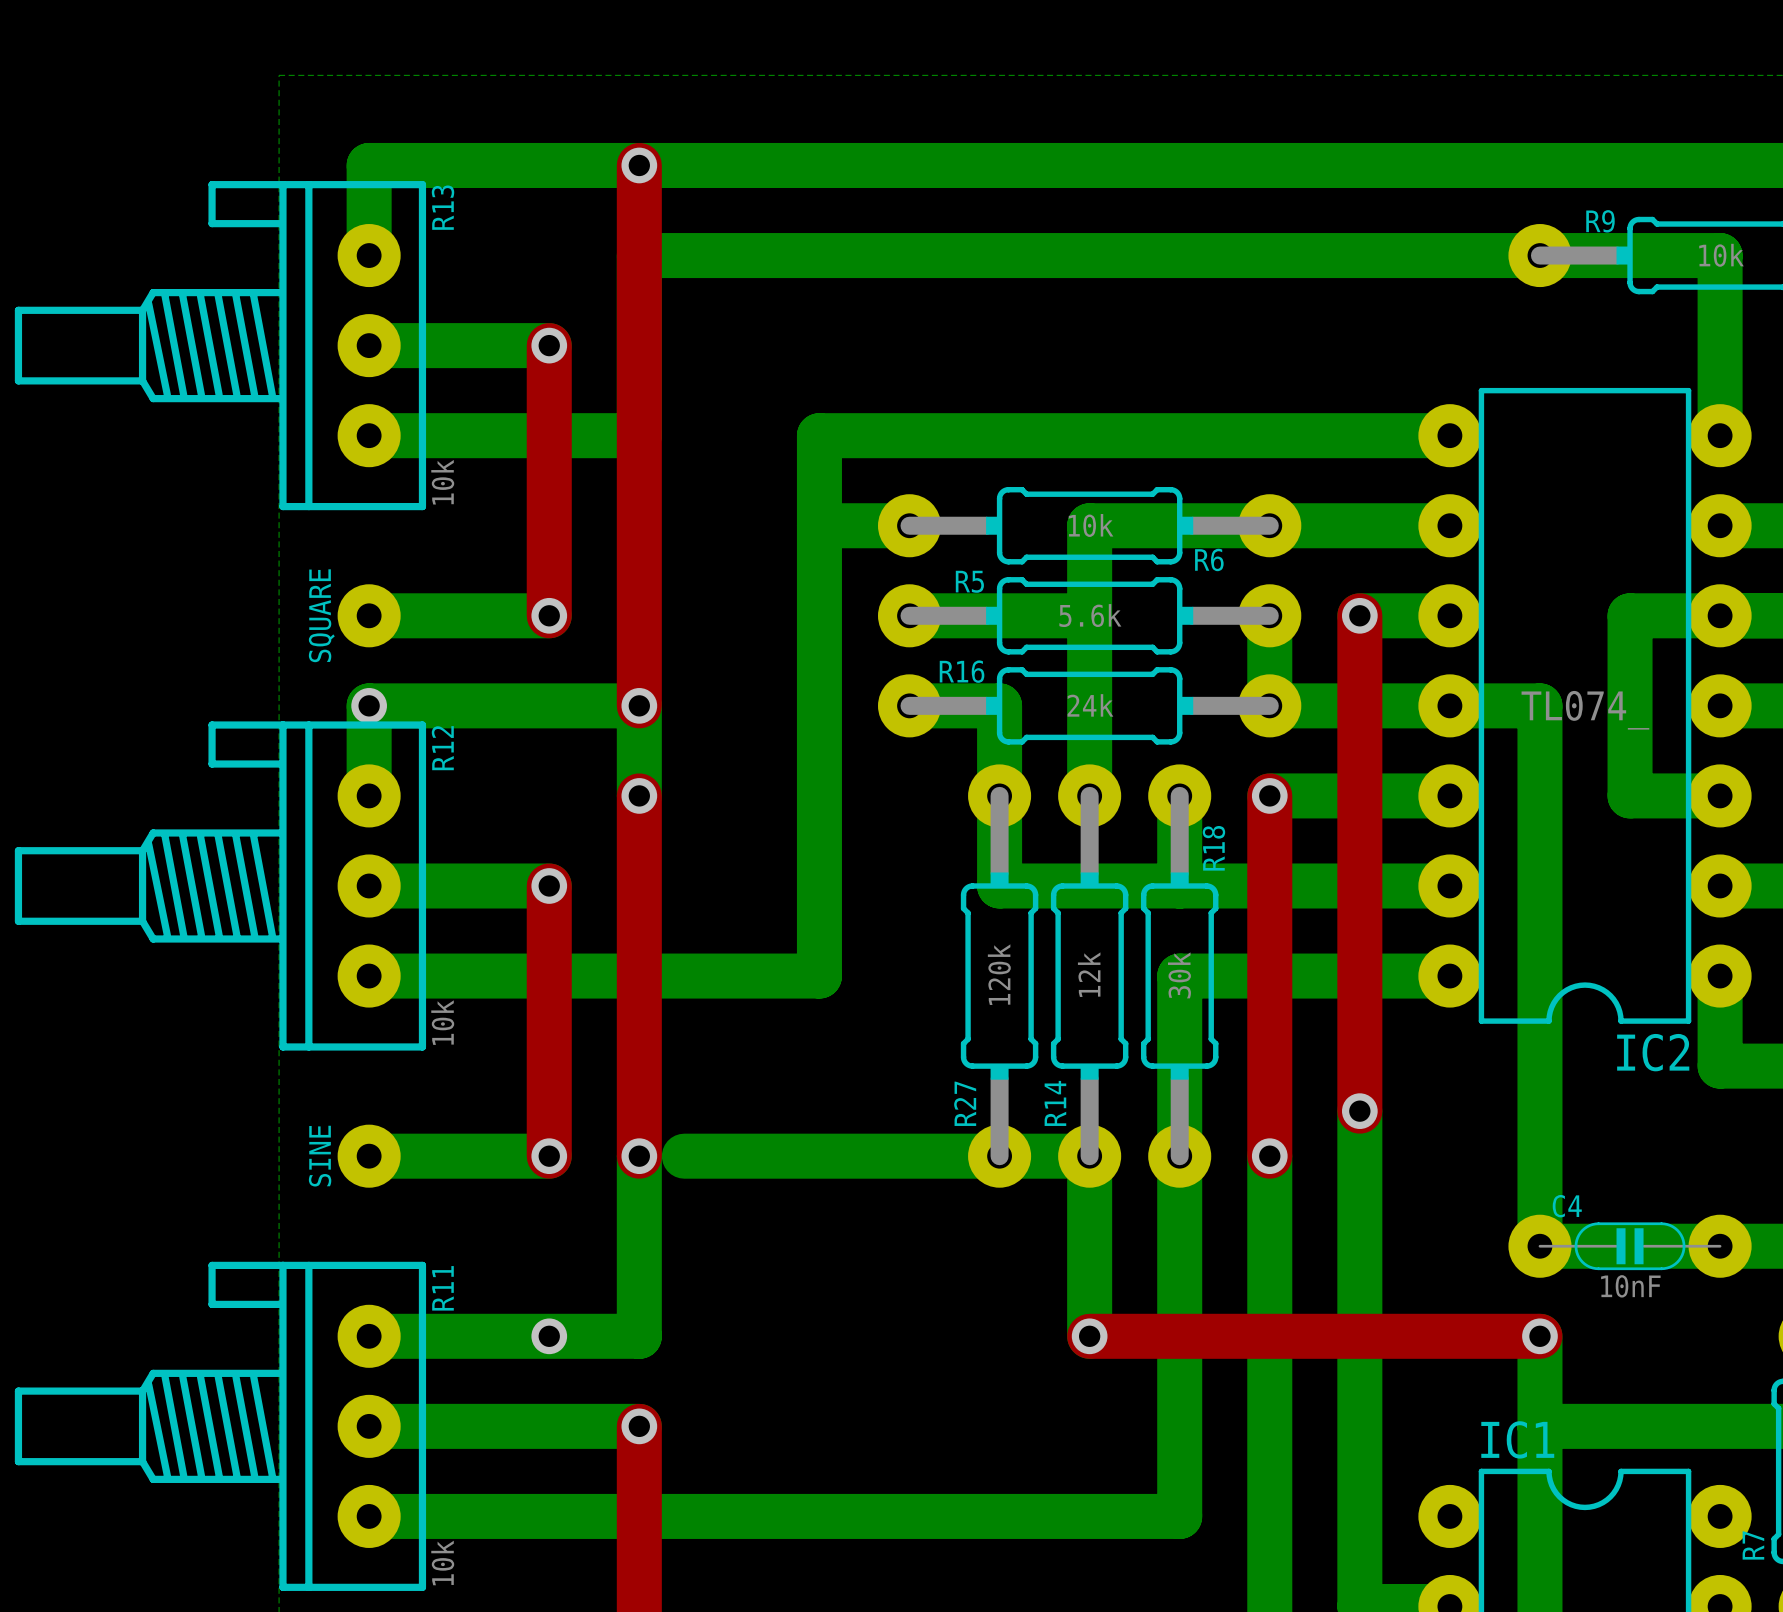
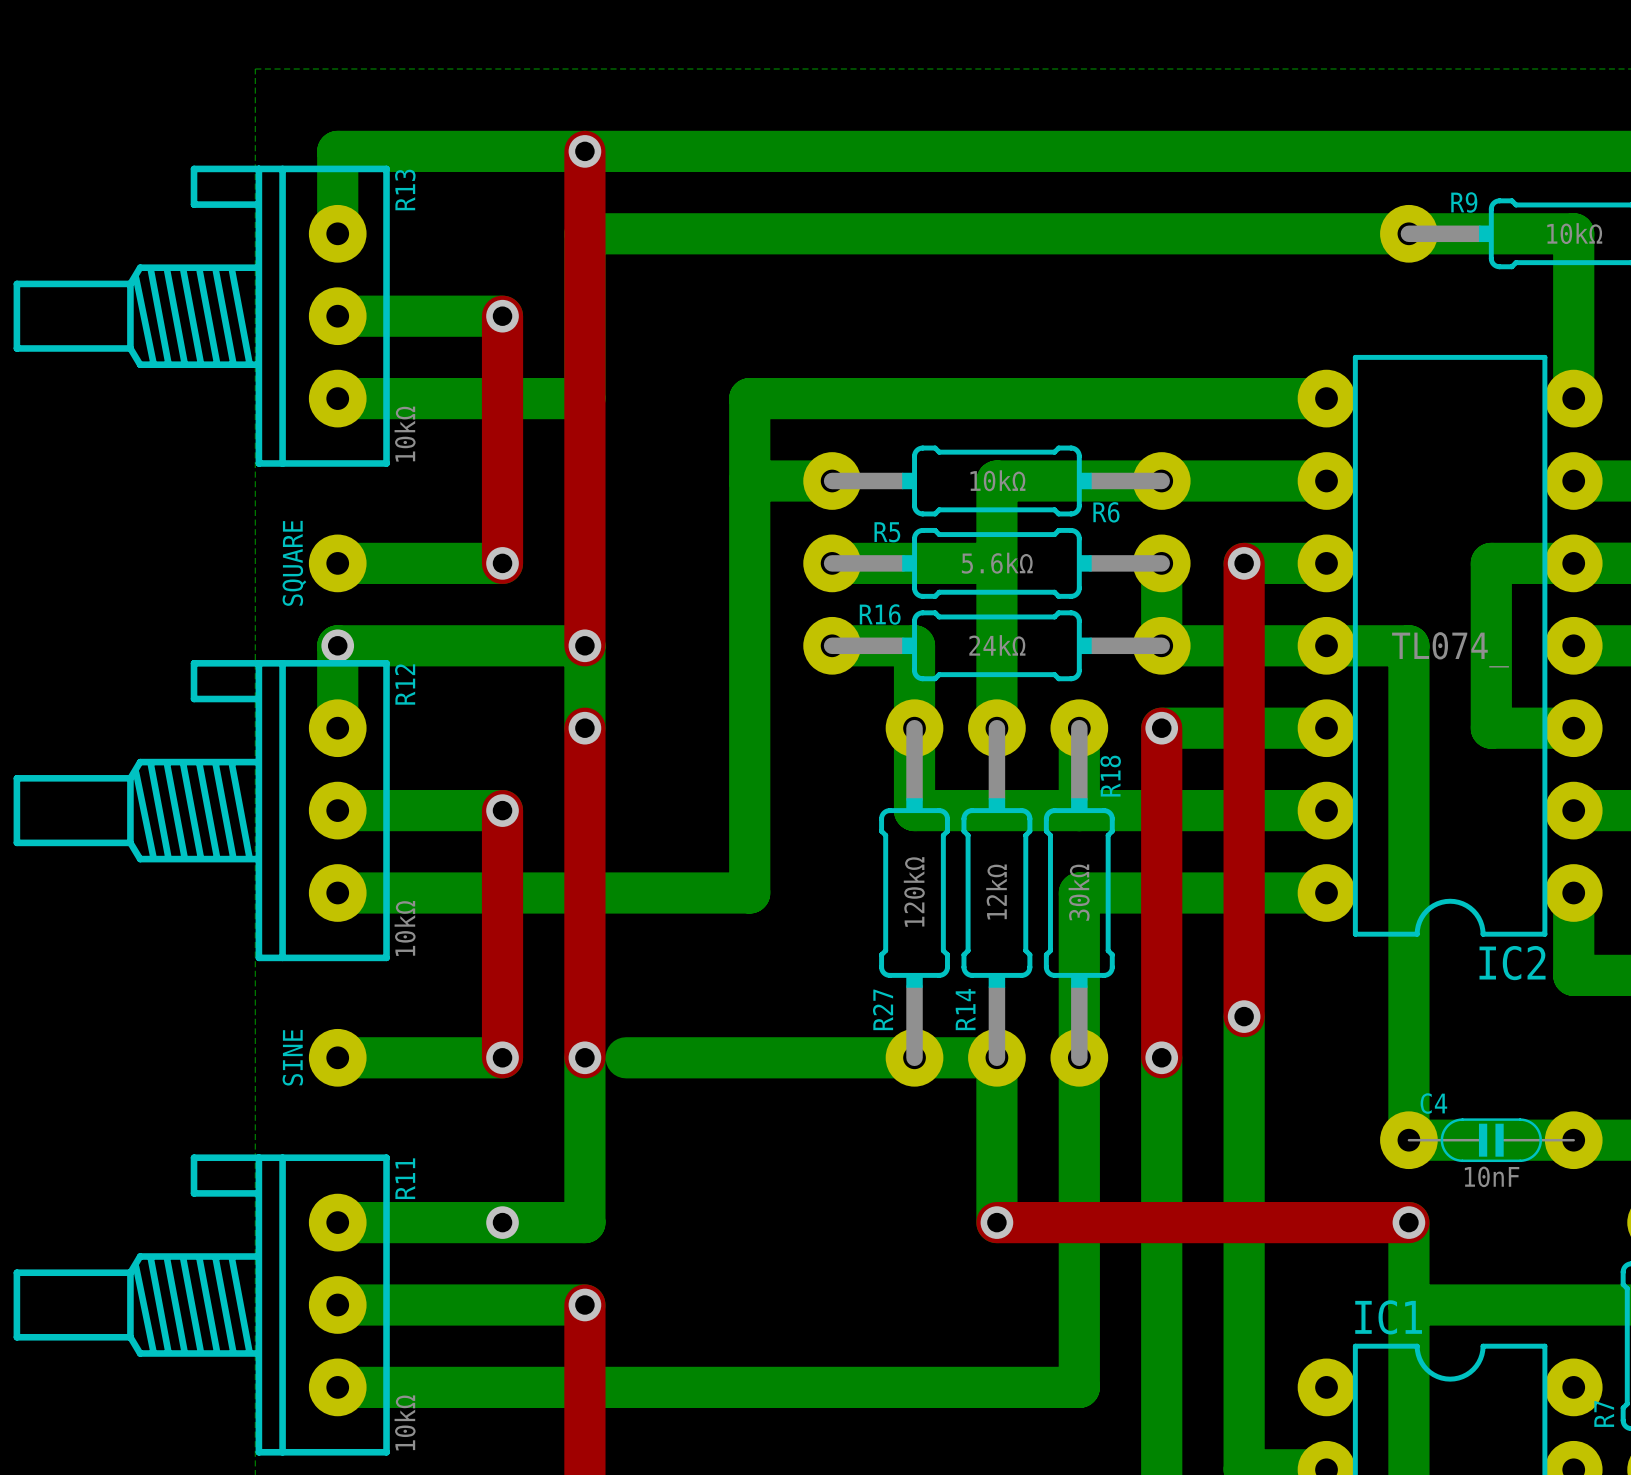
R9 value: 10k (1721, 255) -> 10kΩ (1574, 233)
R13 value: 10k (442, 482) -> 10kΩ (405, 434)
R6 value: 10k (1091, 525) -> 10kΩ (997, 480)
R5 value: 5.6k (1090, 615) -> 5.6kΩ (997, 563)
R16 value: 24k (1090, 705) -> 24kΩ (997, 645)
R27 value: 120k (999, 974) -> 120kΩ (914, 891)
R14 value: 12k (1089, 974) -> 12kΩ (996, 891)
R18 value: 30k (1179, 975) -> 30kΩ (1079, 892)
R12 value: 10k (442, 1022) -> 10kΩ (405, 928)
R11 value: 10k (442, 1562) -> 10kΩ (405, 1422)

